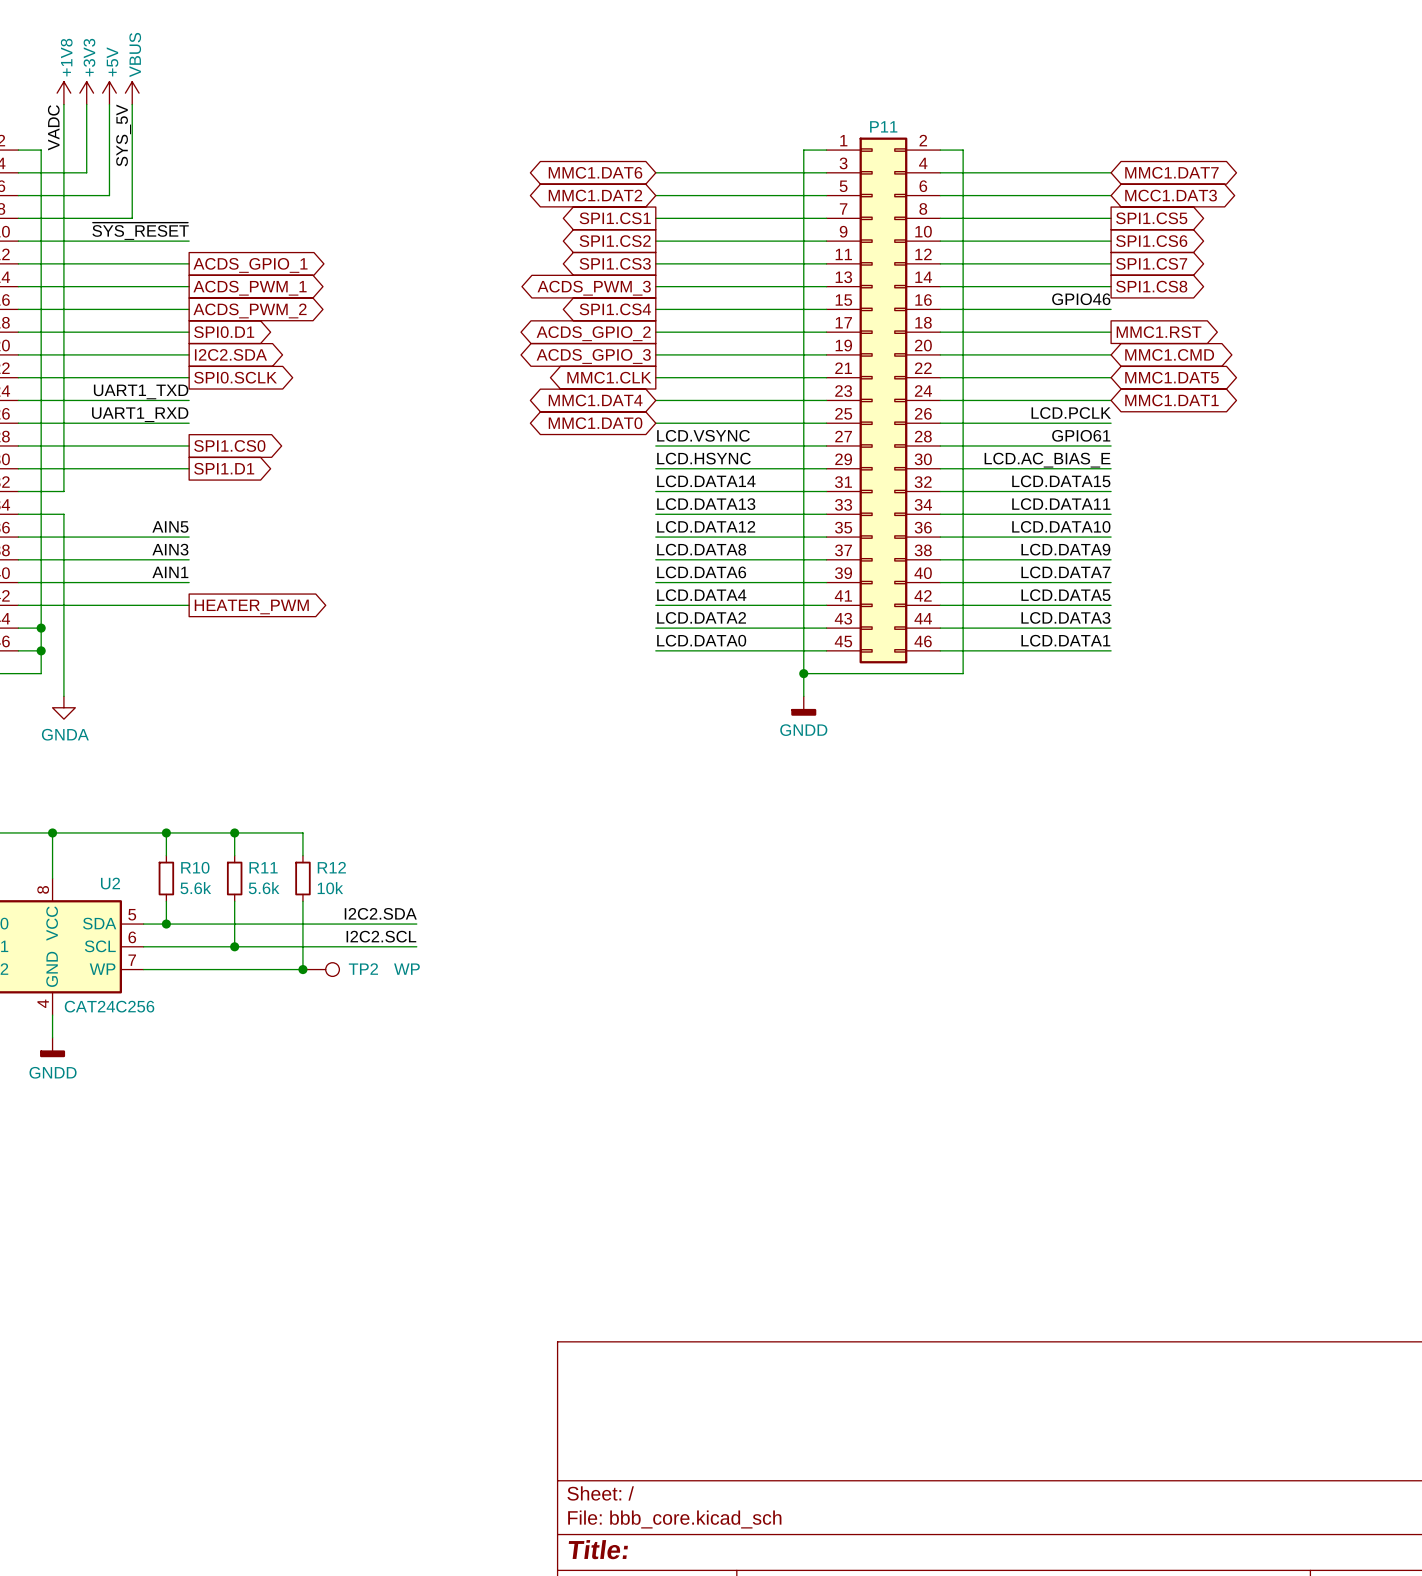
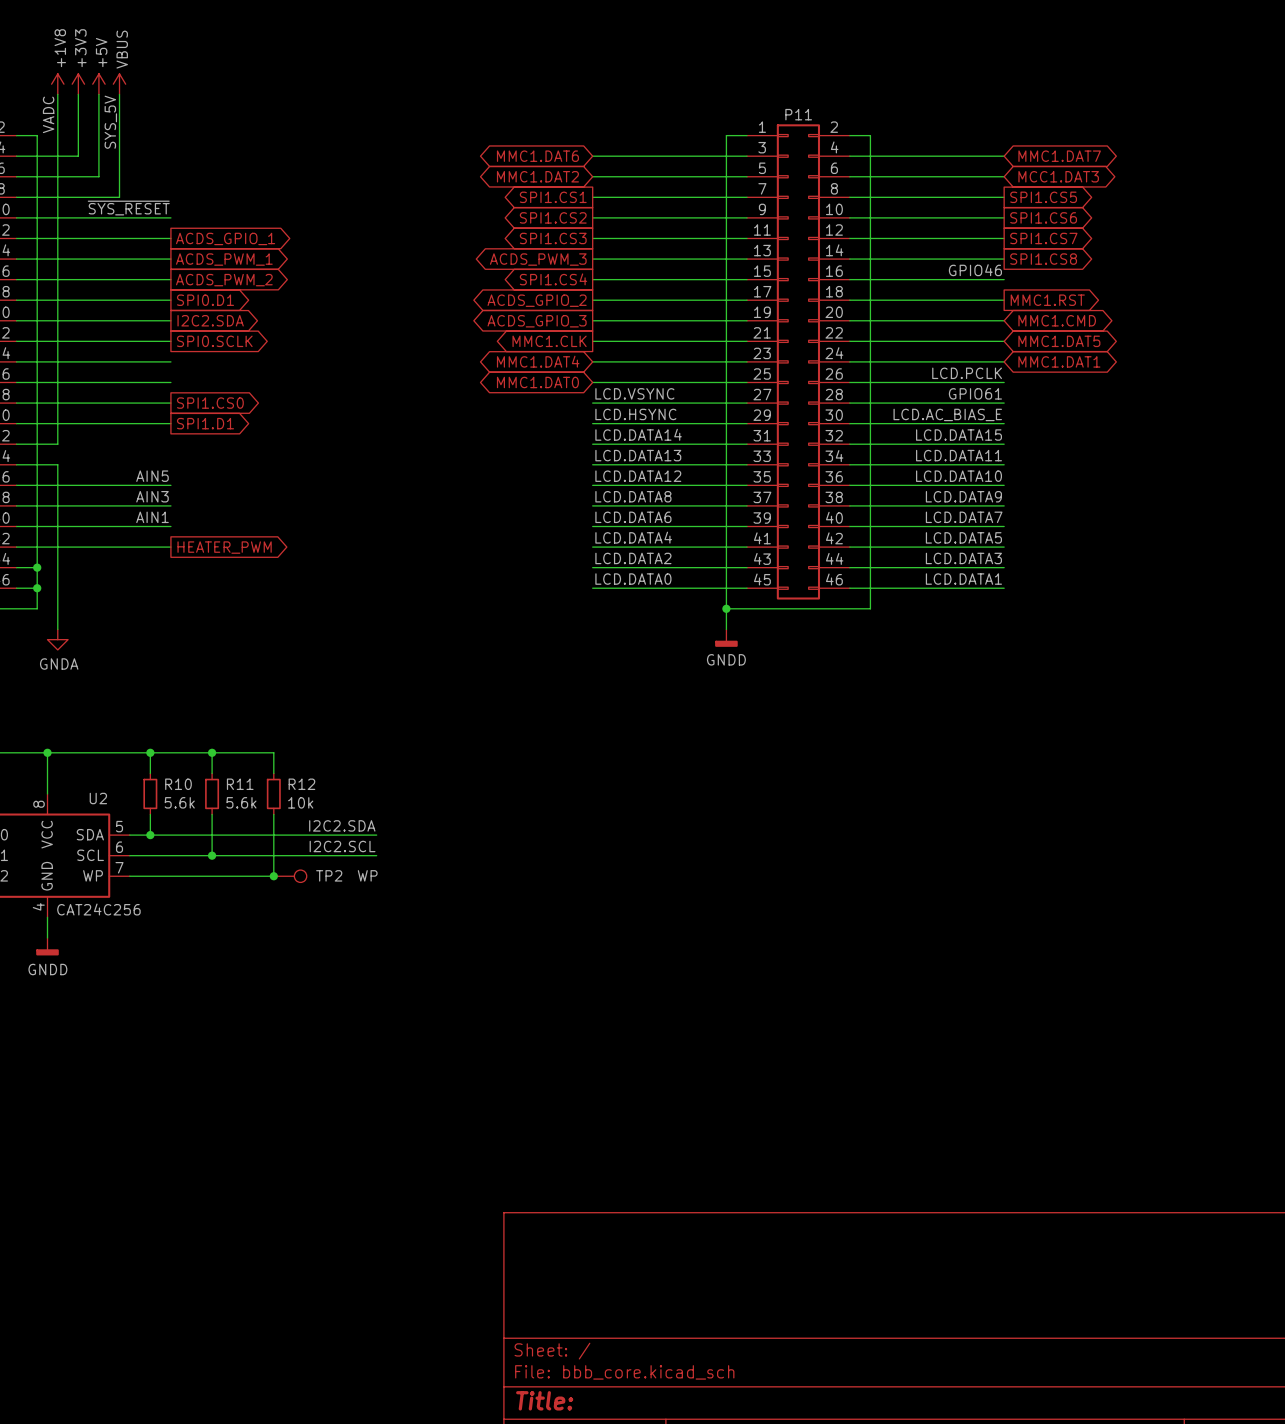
label: UART1_TXD (141, 391) -> none
label: UART1_RXD (140, 414) -> none

